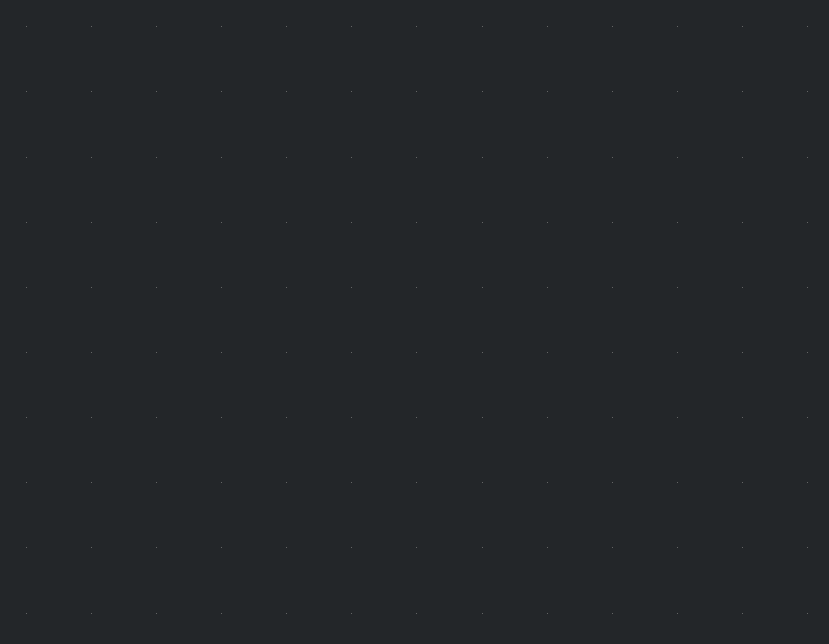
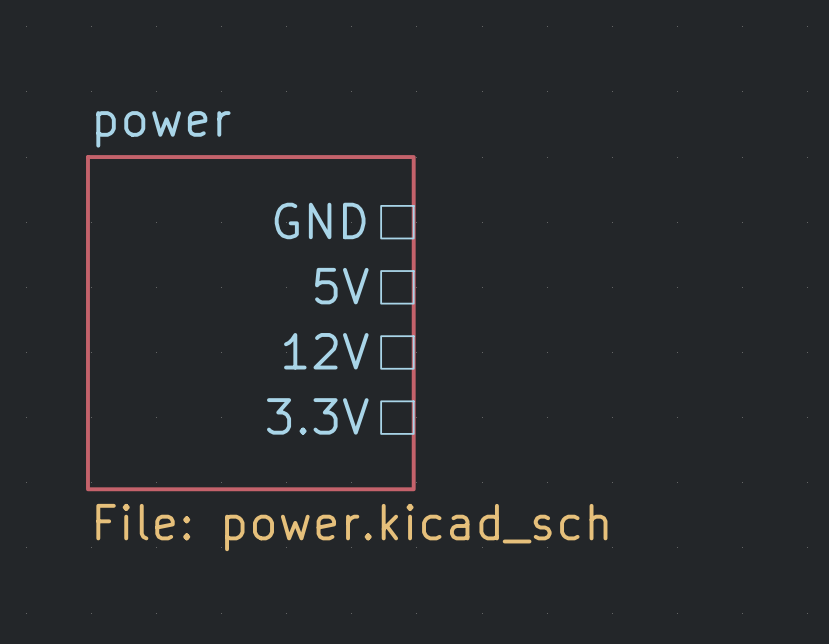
sheet pin: none -> GND (320, 220)
sheet pin: none -> 5V (341, 286)
sheet power: none -> File: power.kicad_sch (250, 323)
sheet pin: none -> 12V (326, 351)
sheet pin: none -> 3.3V (317, 416)

